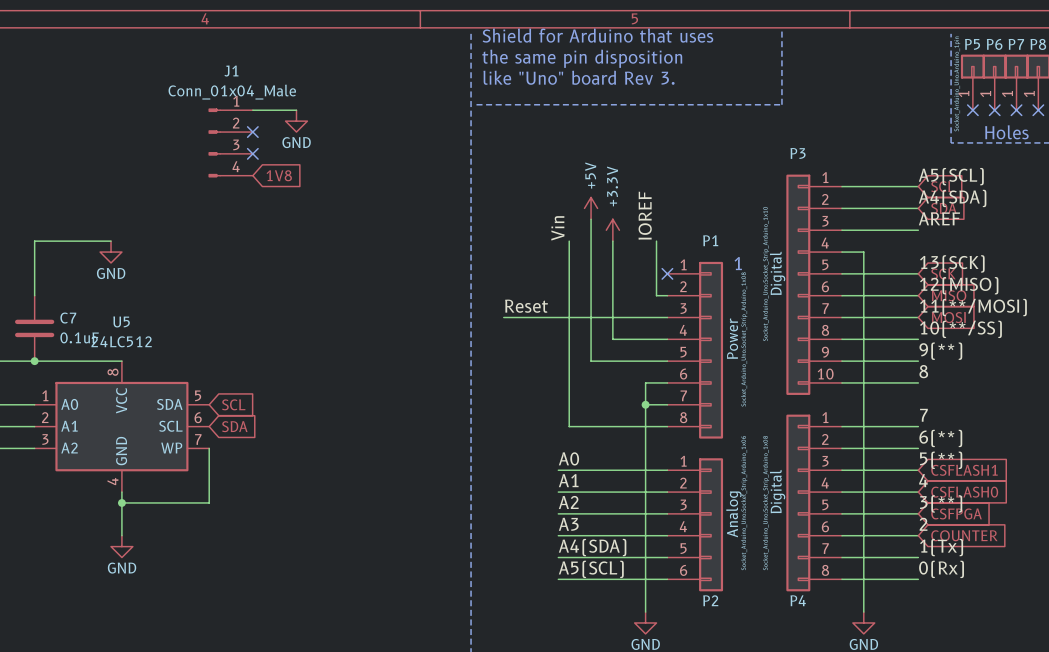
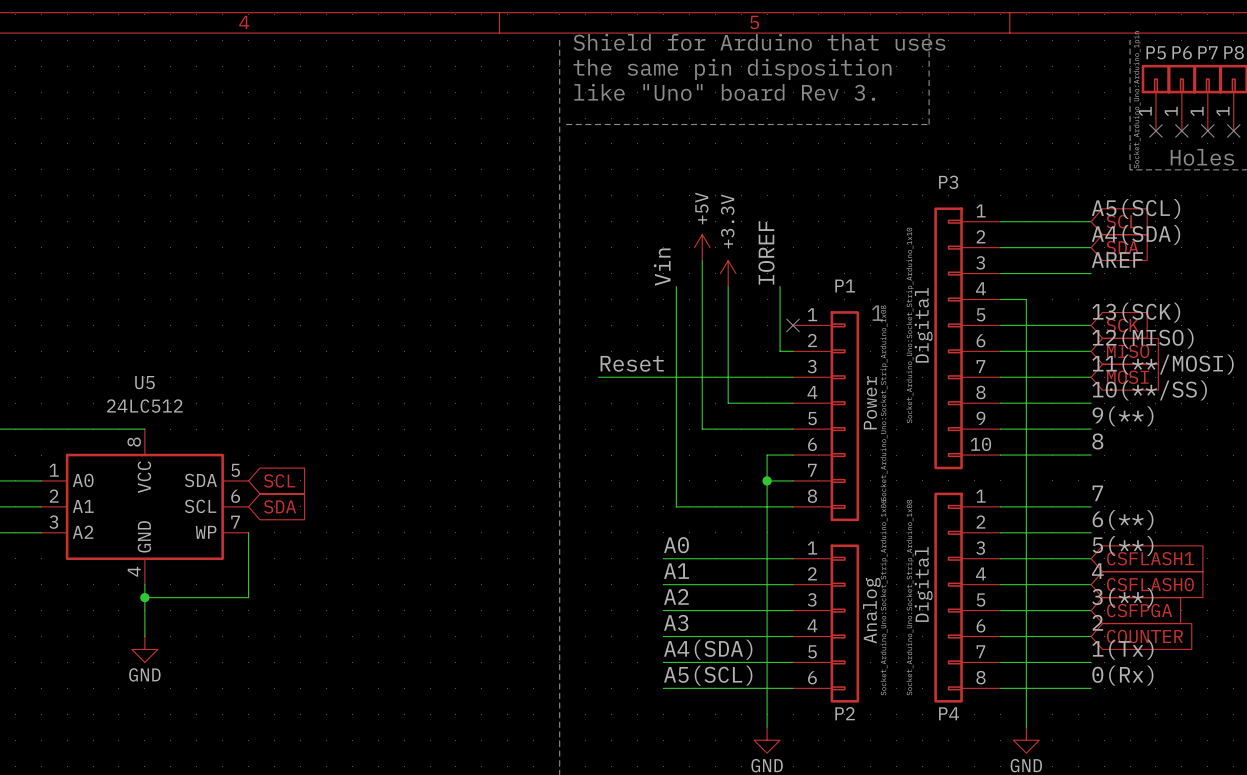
wire: (252, 110) (296, 110) -> none
power symbol: GND (296, 121) -> none
no-connect mark: (252, 132) -> none
J1: Conn_01x04_Male (230, 142) -> none
no-connect mark: (252, 153) -> none
global label: 1V8 (279, 175) -> none
wire: (111, 241) (34, 241) (34, 295) -> none
power symbol: GND (111, 252) -> none
C7: 0.1uF (34, 328) -> none
junction: (34, 361) -> none

